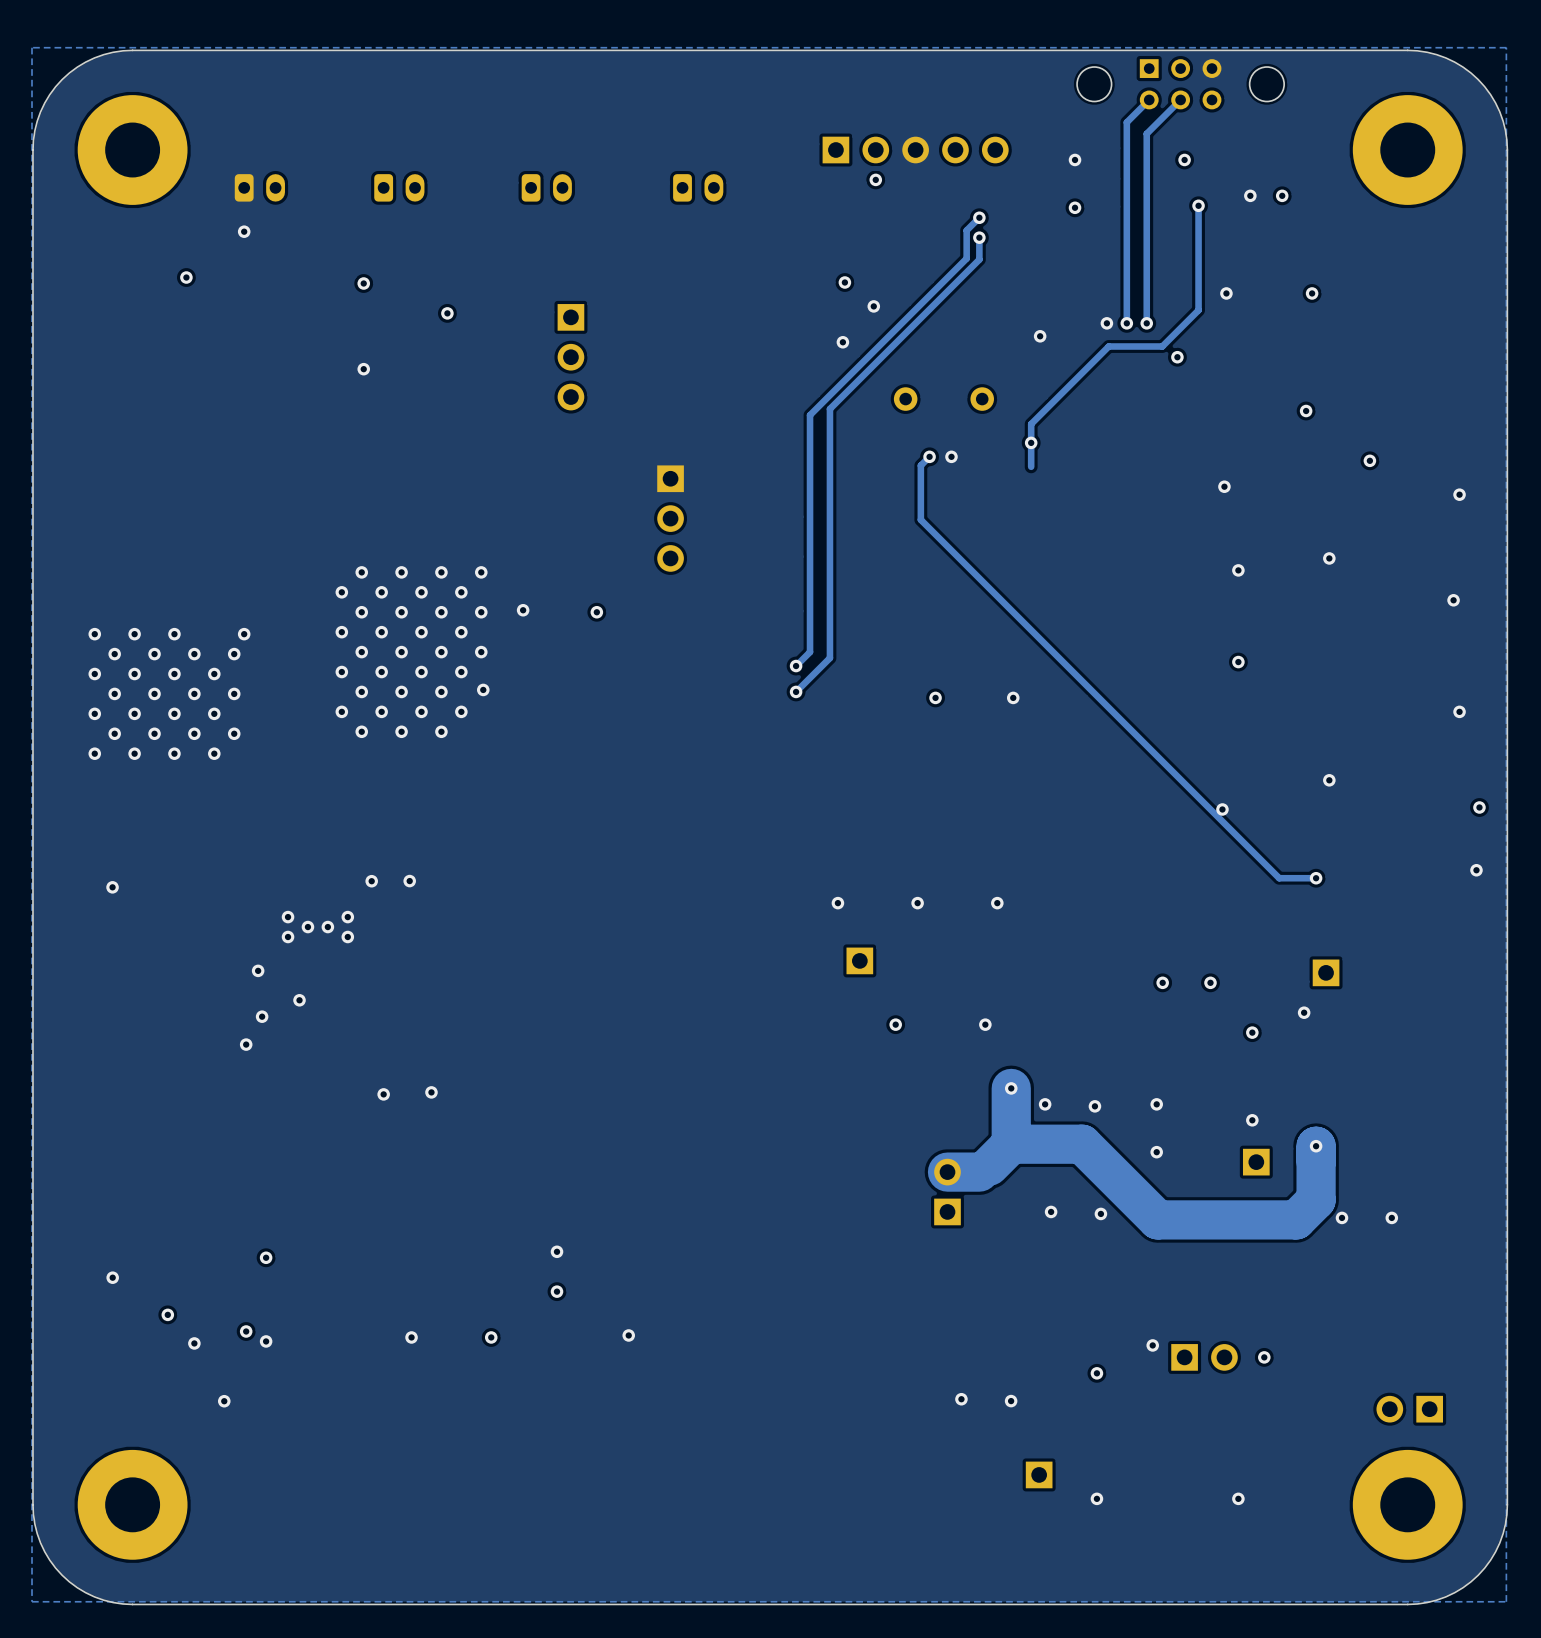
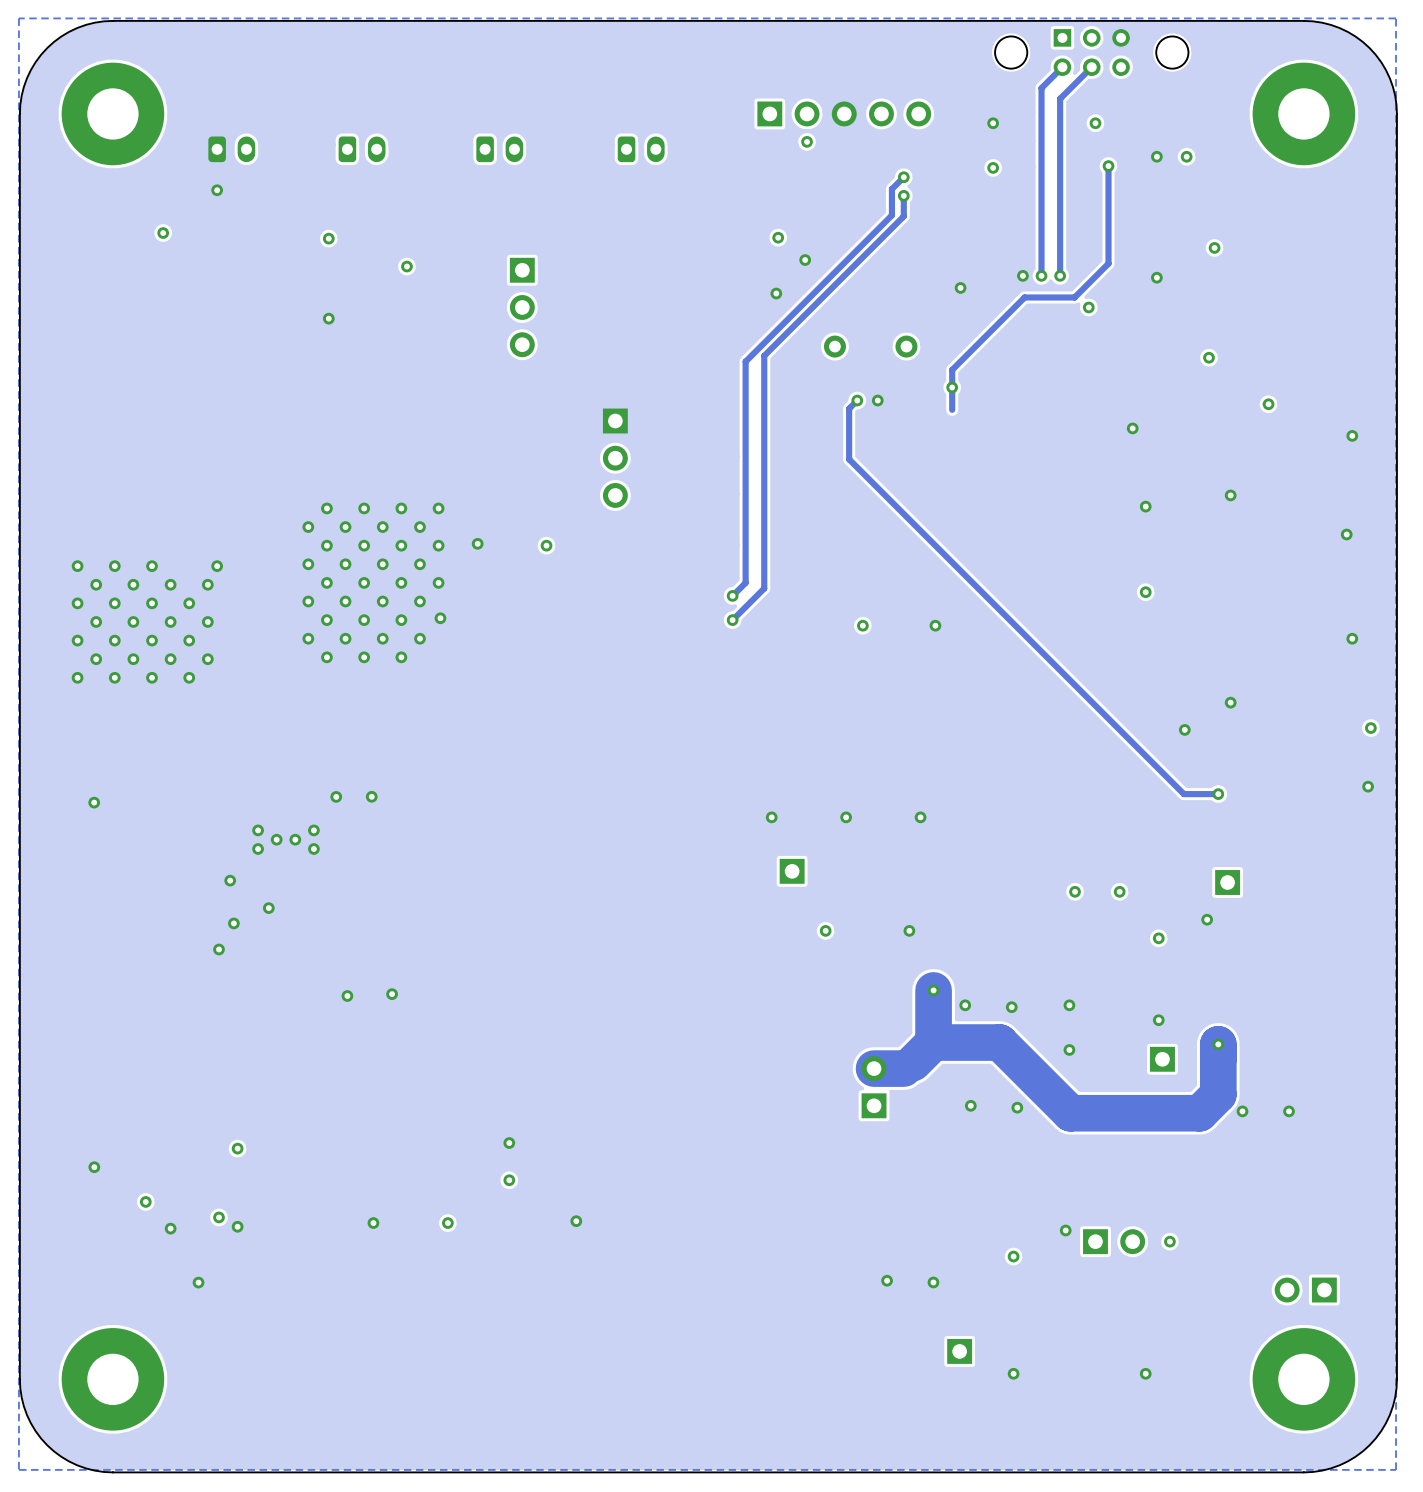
via position: (1226, 293) -> (1156, 277)
via position: (1222, 809) -> (1184, 729)

